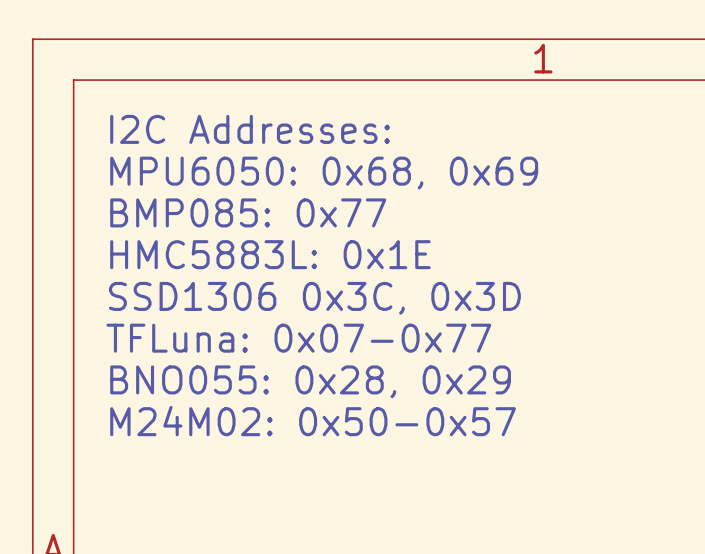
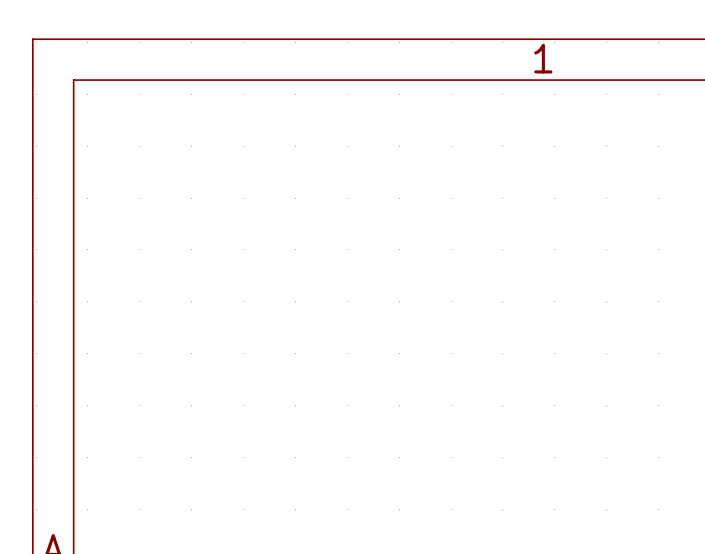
text: I2C Addresses: (250, 129) -> none
text: MPU6050: 0x68, 0x69 (324, 173) -> none
text: BMP085: 0x77 (248, 212) -> none
text: HMC5883L: 0x1E (270, 254) -> none
text: SSD1306 0x3C, 0x3D (314, 298) -> none
text: TFLuna: 0x07-0x77 (298, 338) -> none
text: BNO055: 0x28, 0x29 (310, 381) -> none
text: M24M02: 0x50-0x57 (313, 421) -> none

